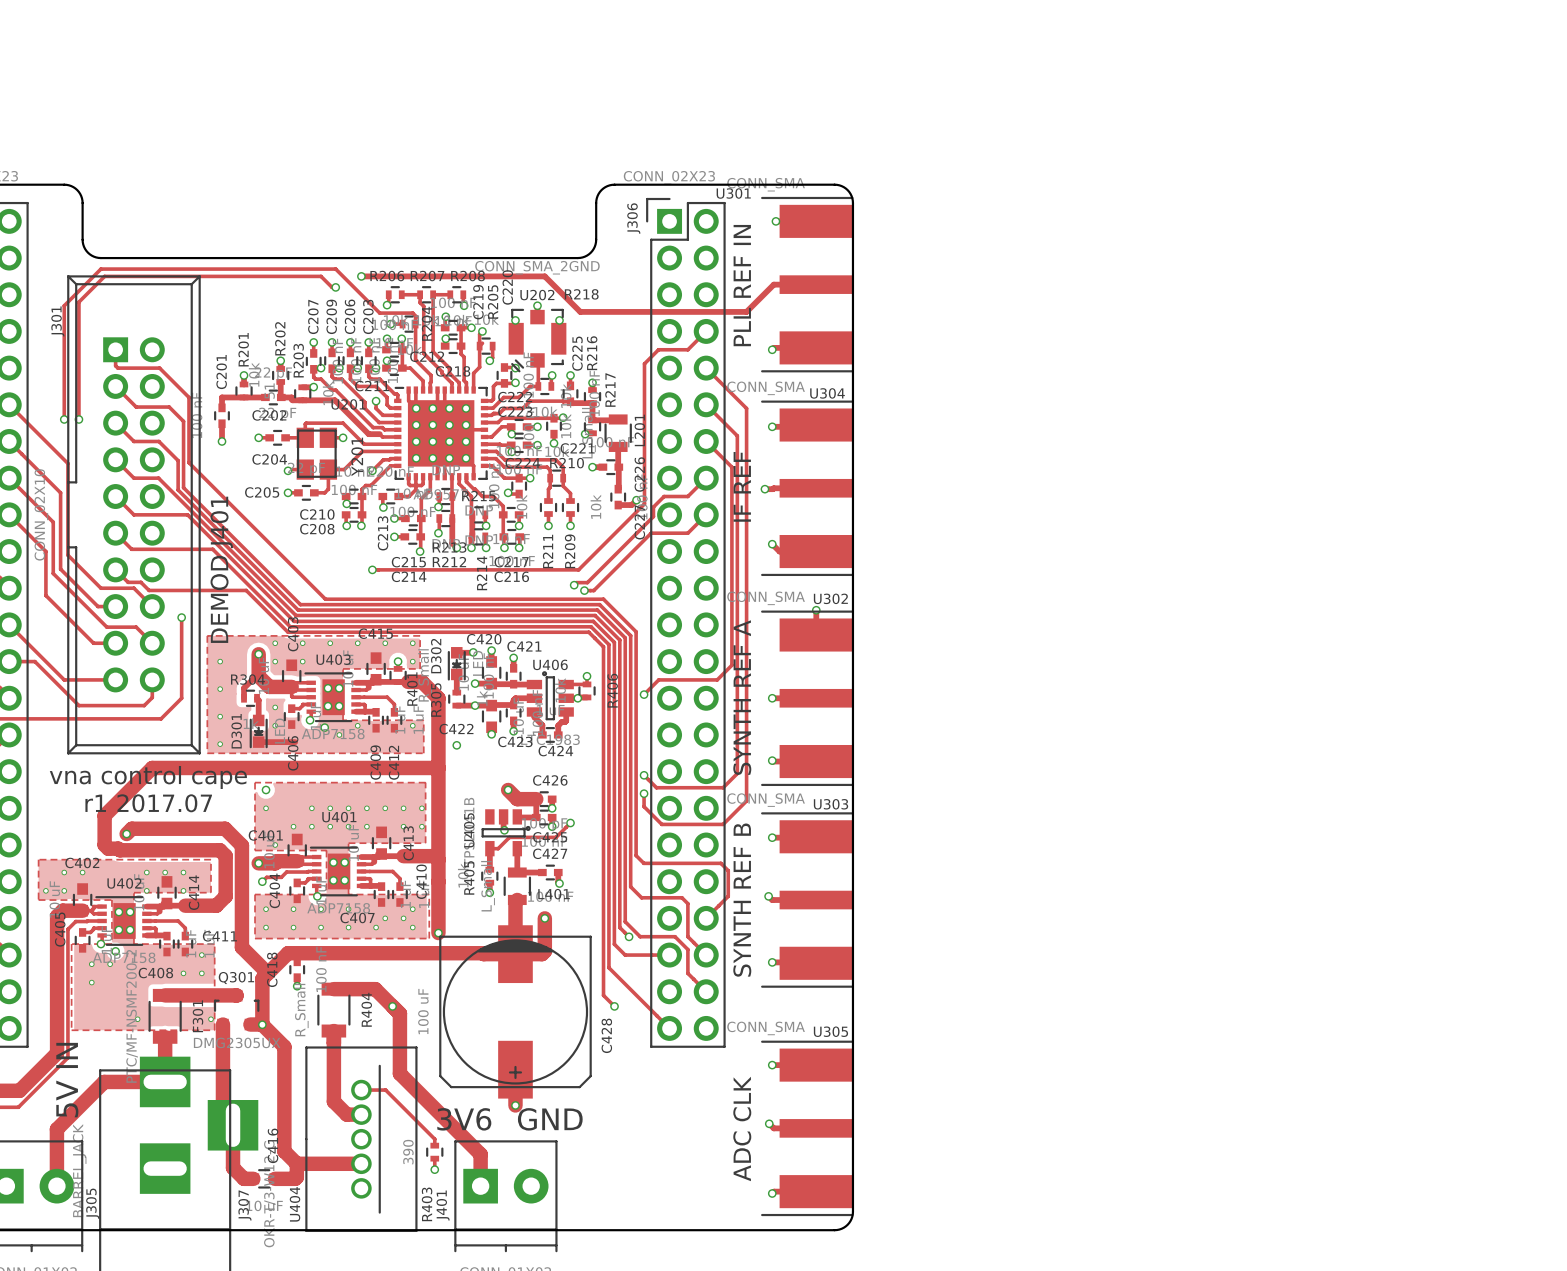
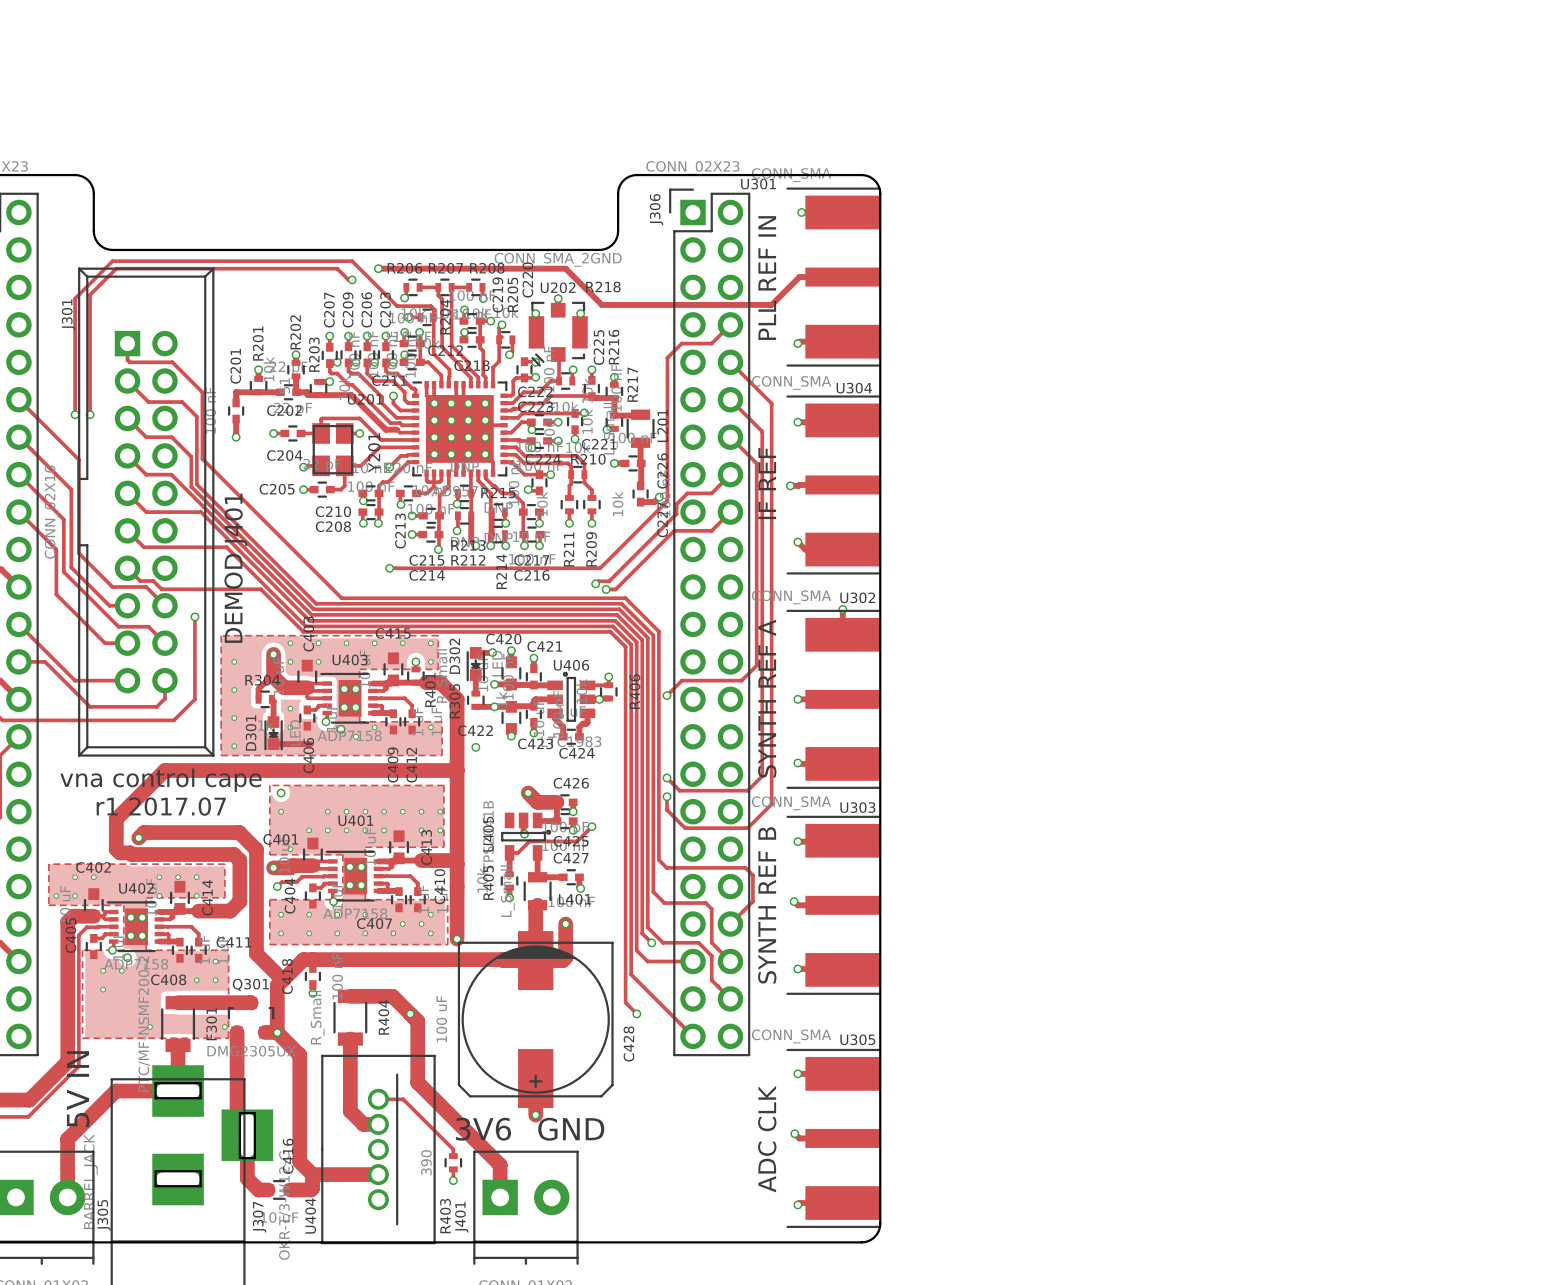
board edge: none -> (155, 1083) (155, 1098) (200, 1098) (200, 1083) (155, 1083)
board edge: none -> (239, 1113) (239, 1158) (254, 1158) (254, 1113) (239, 1113)
board edge: none -> (155, 1171) (200, 1171) (200, 1186) (155, 1186) (155, 1171)

